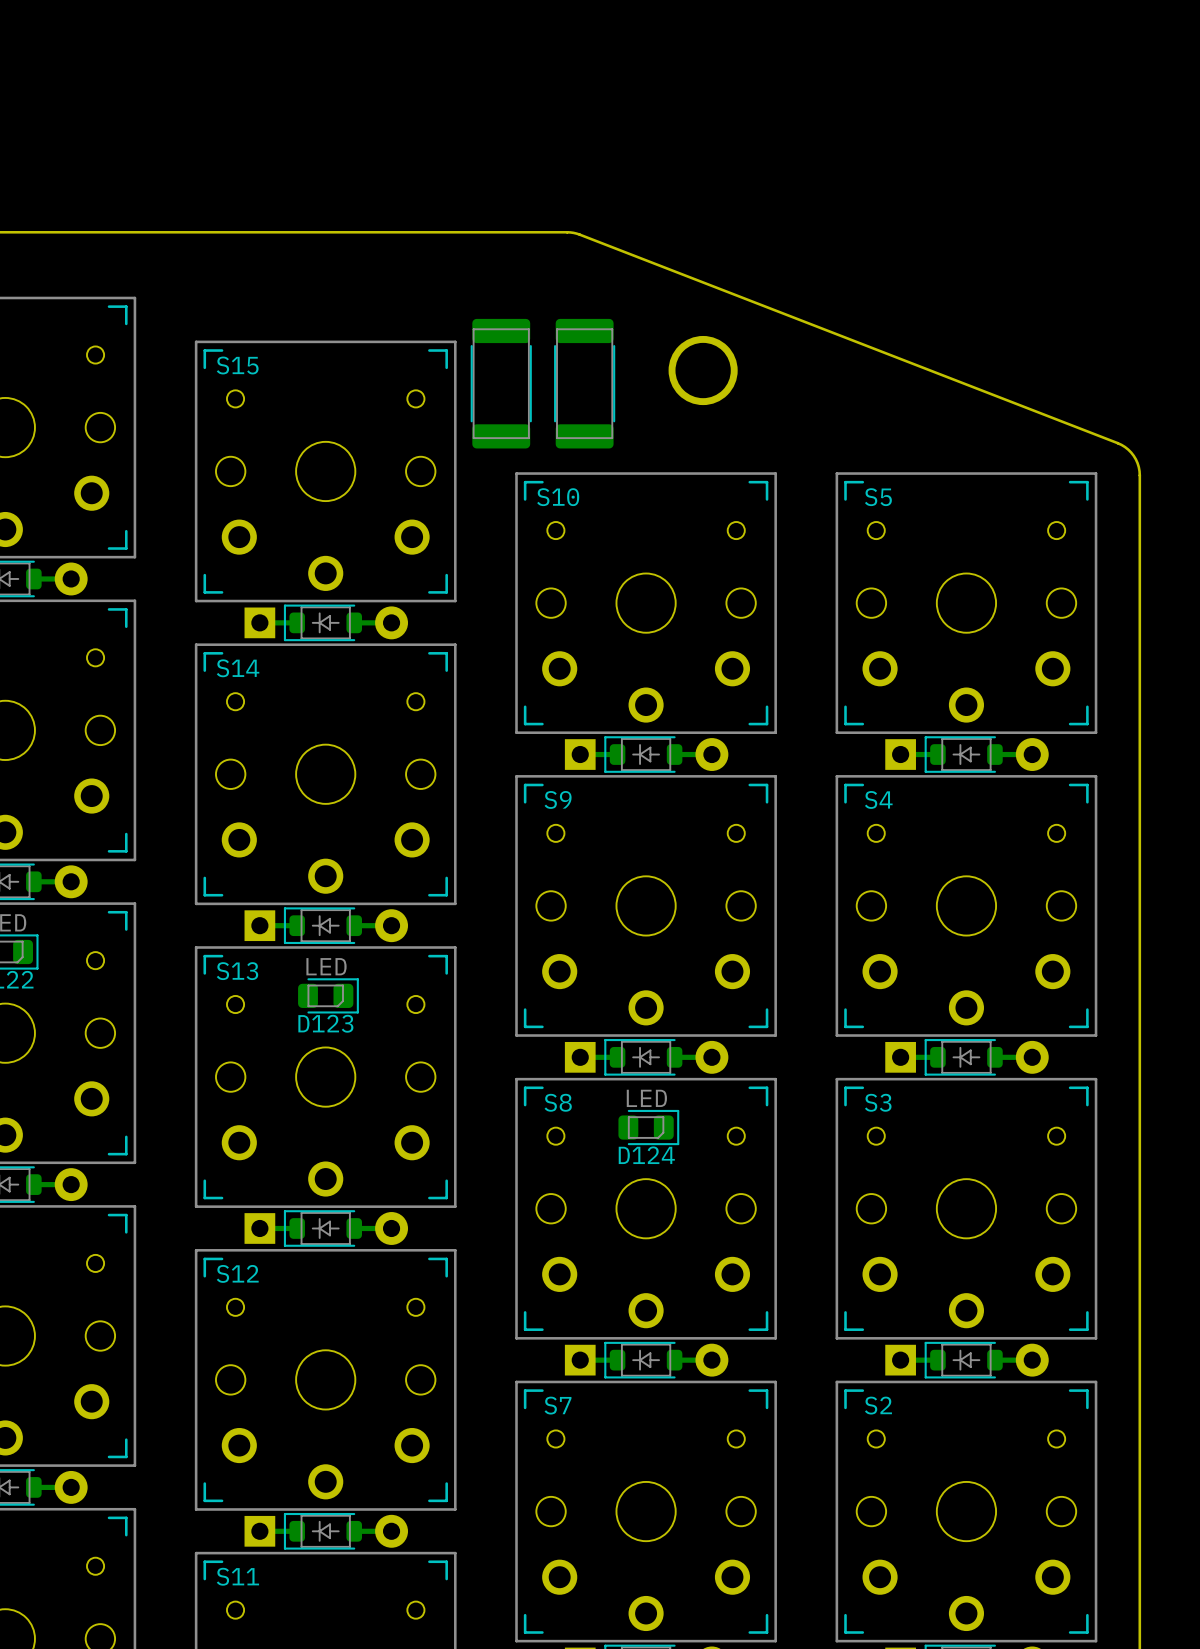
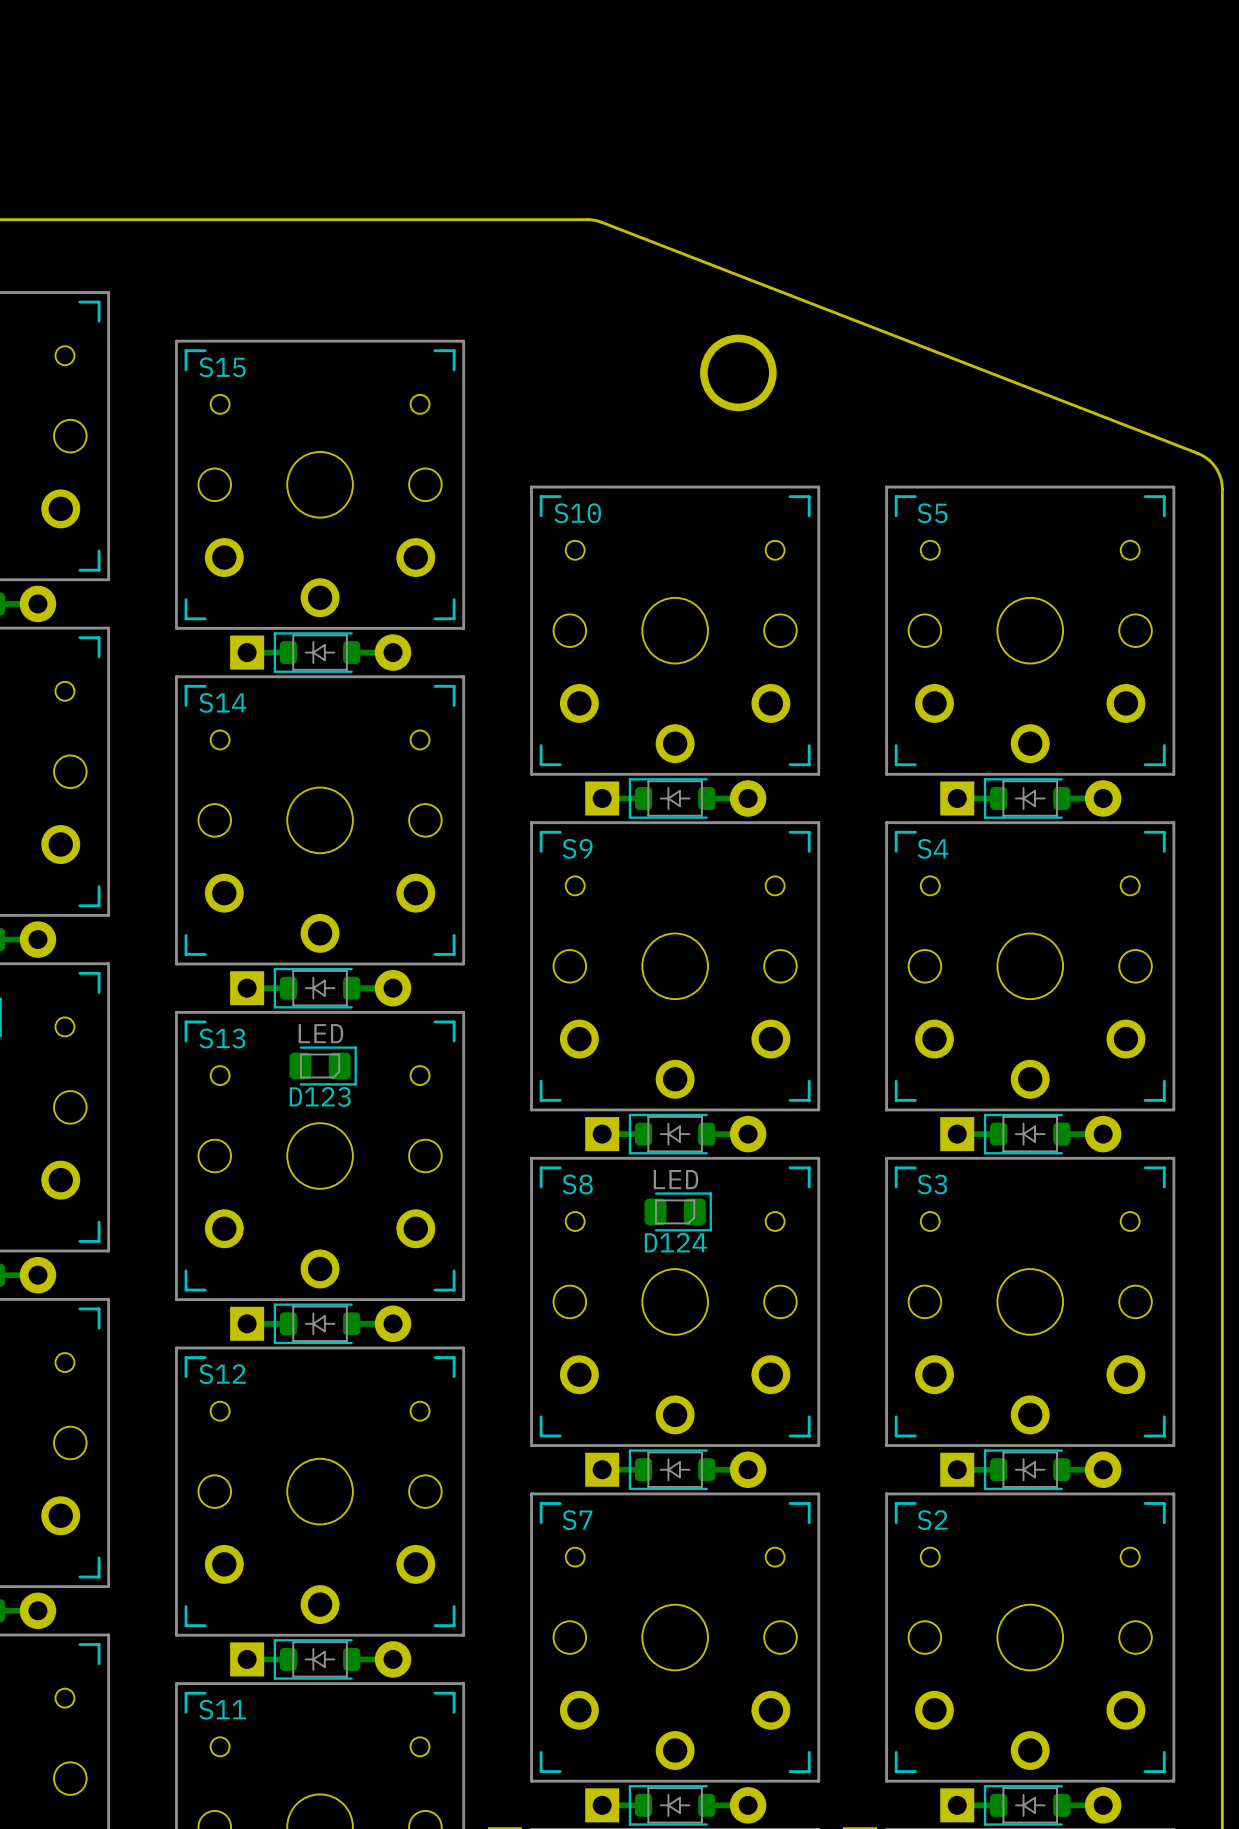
part: (501, 383) -> none
part: (584, 383) -> none

